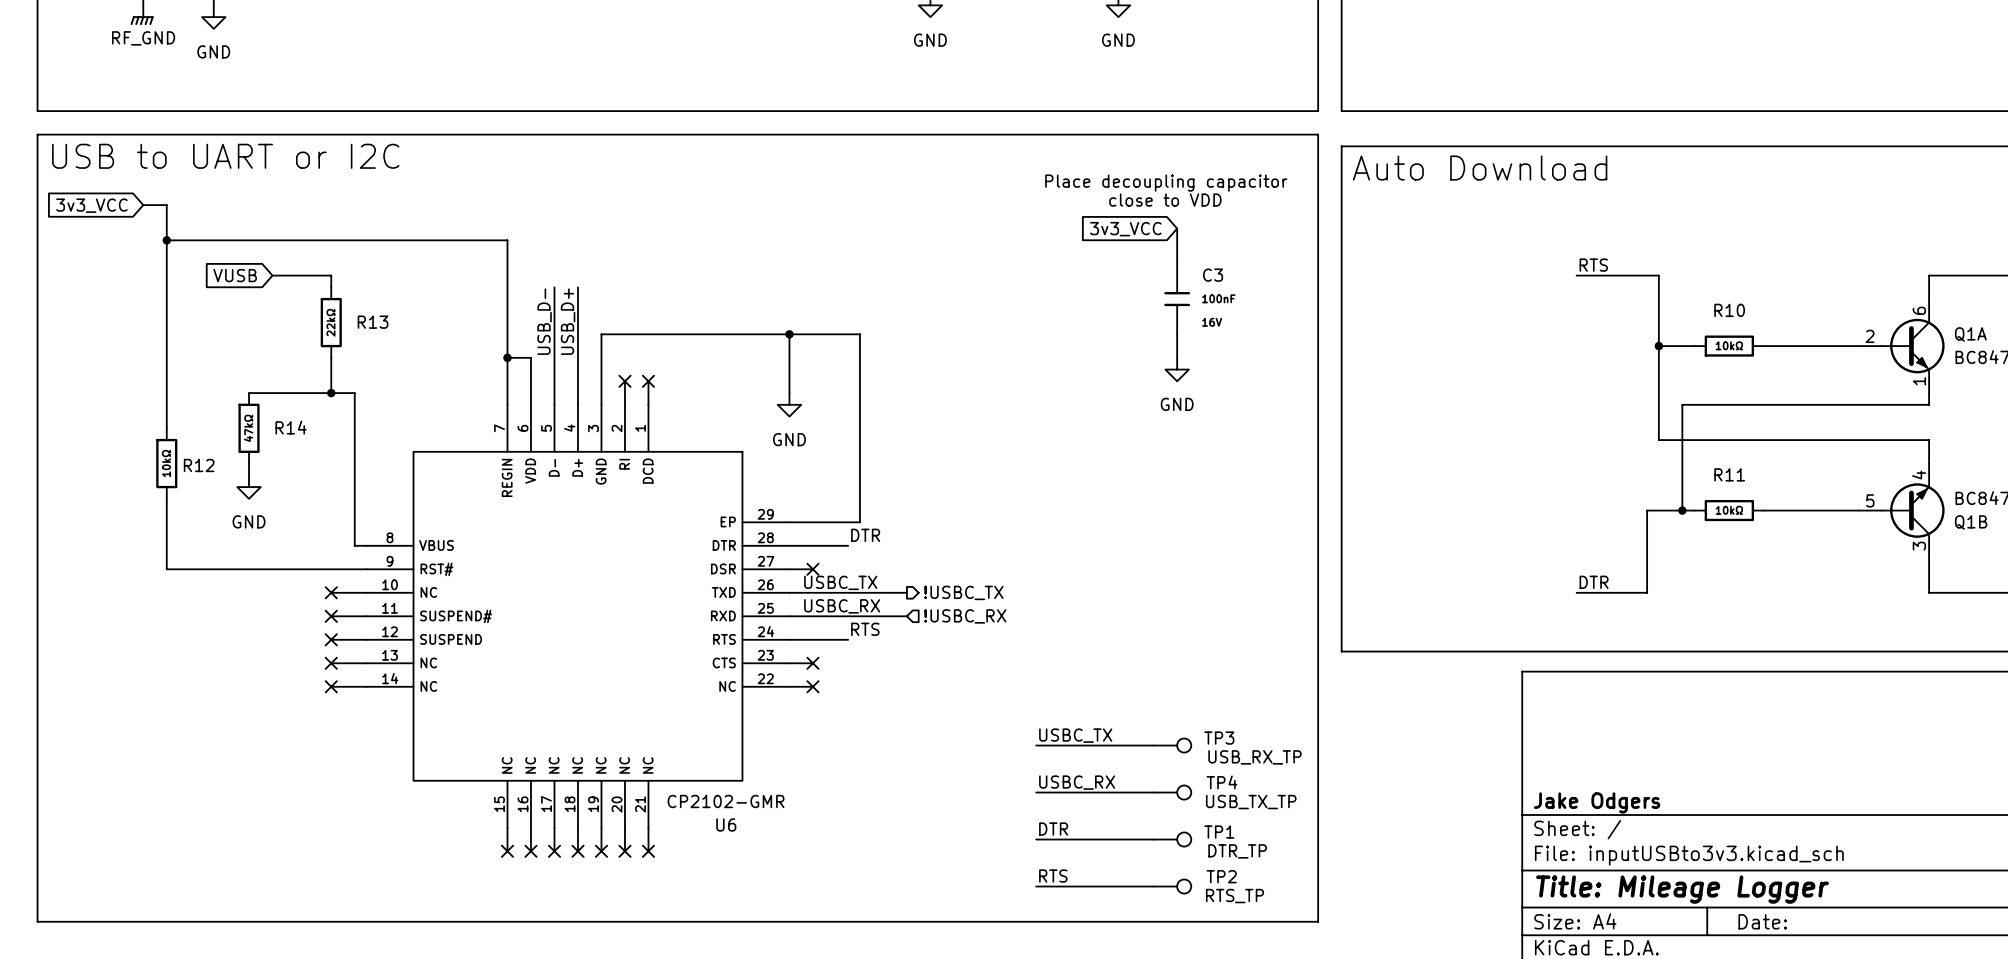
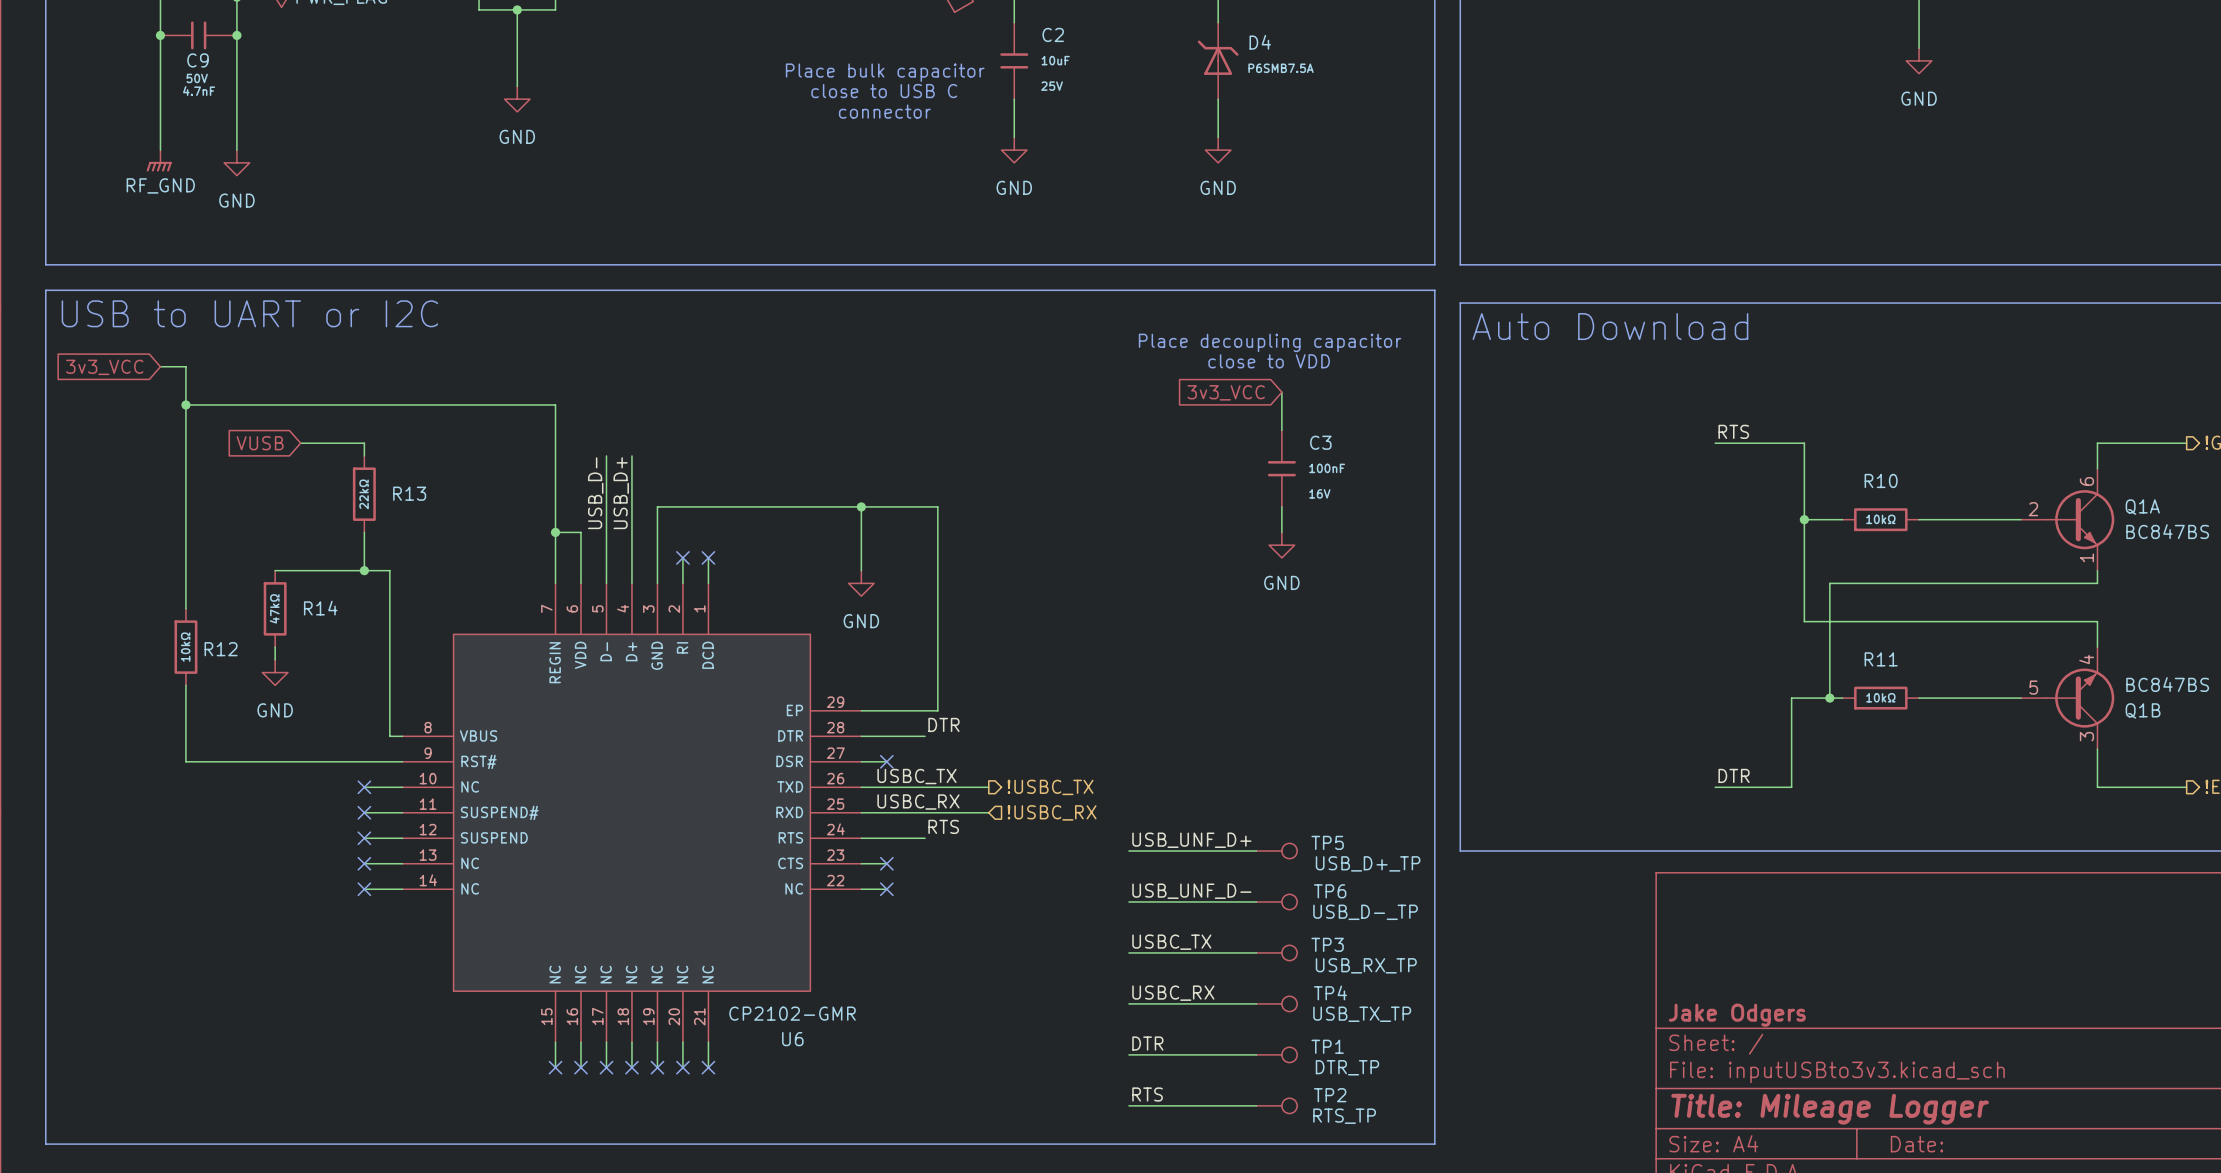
label: none -> USB_UNF_D+ (1191, 840)
wire: none -> (1128, 851) (1256, 851)
TP5: none -> USB_D+_TP (1276, 851)
label: none -> USB_UNF_D- (1191, 891)
wire: none -> (1128, 901) (1256, 901)
TP6: none -> USB_D-_TP (1276, 901)

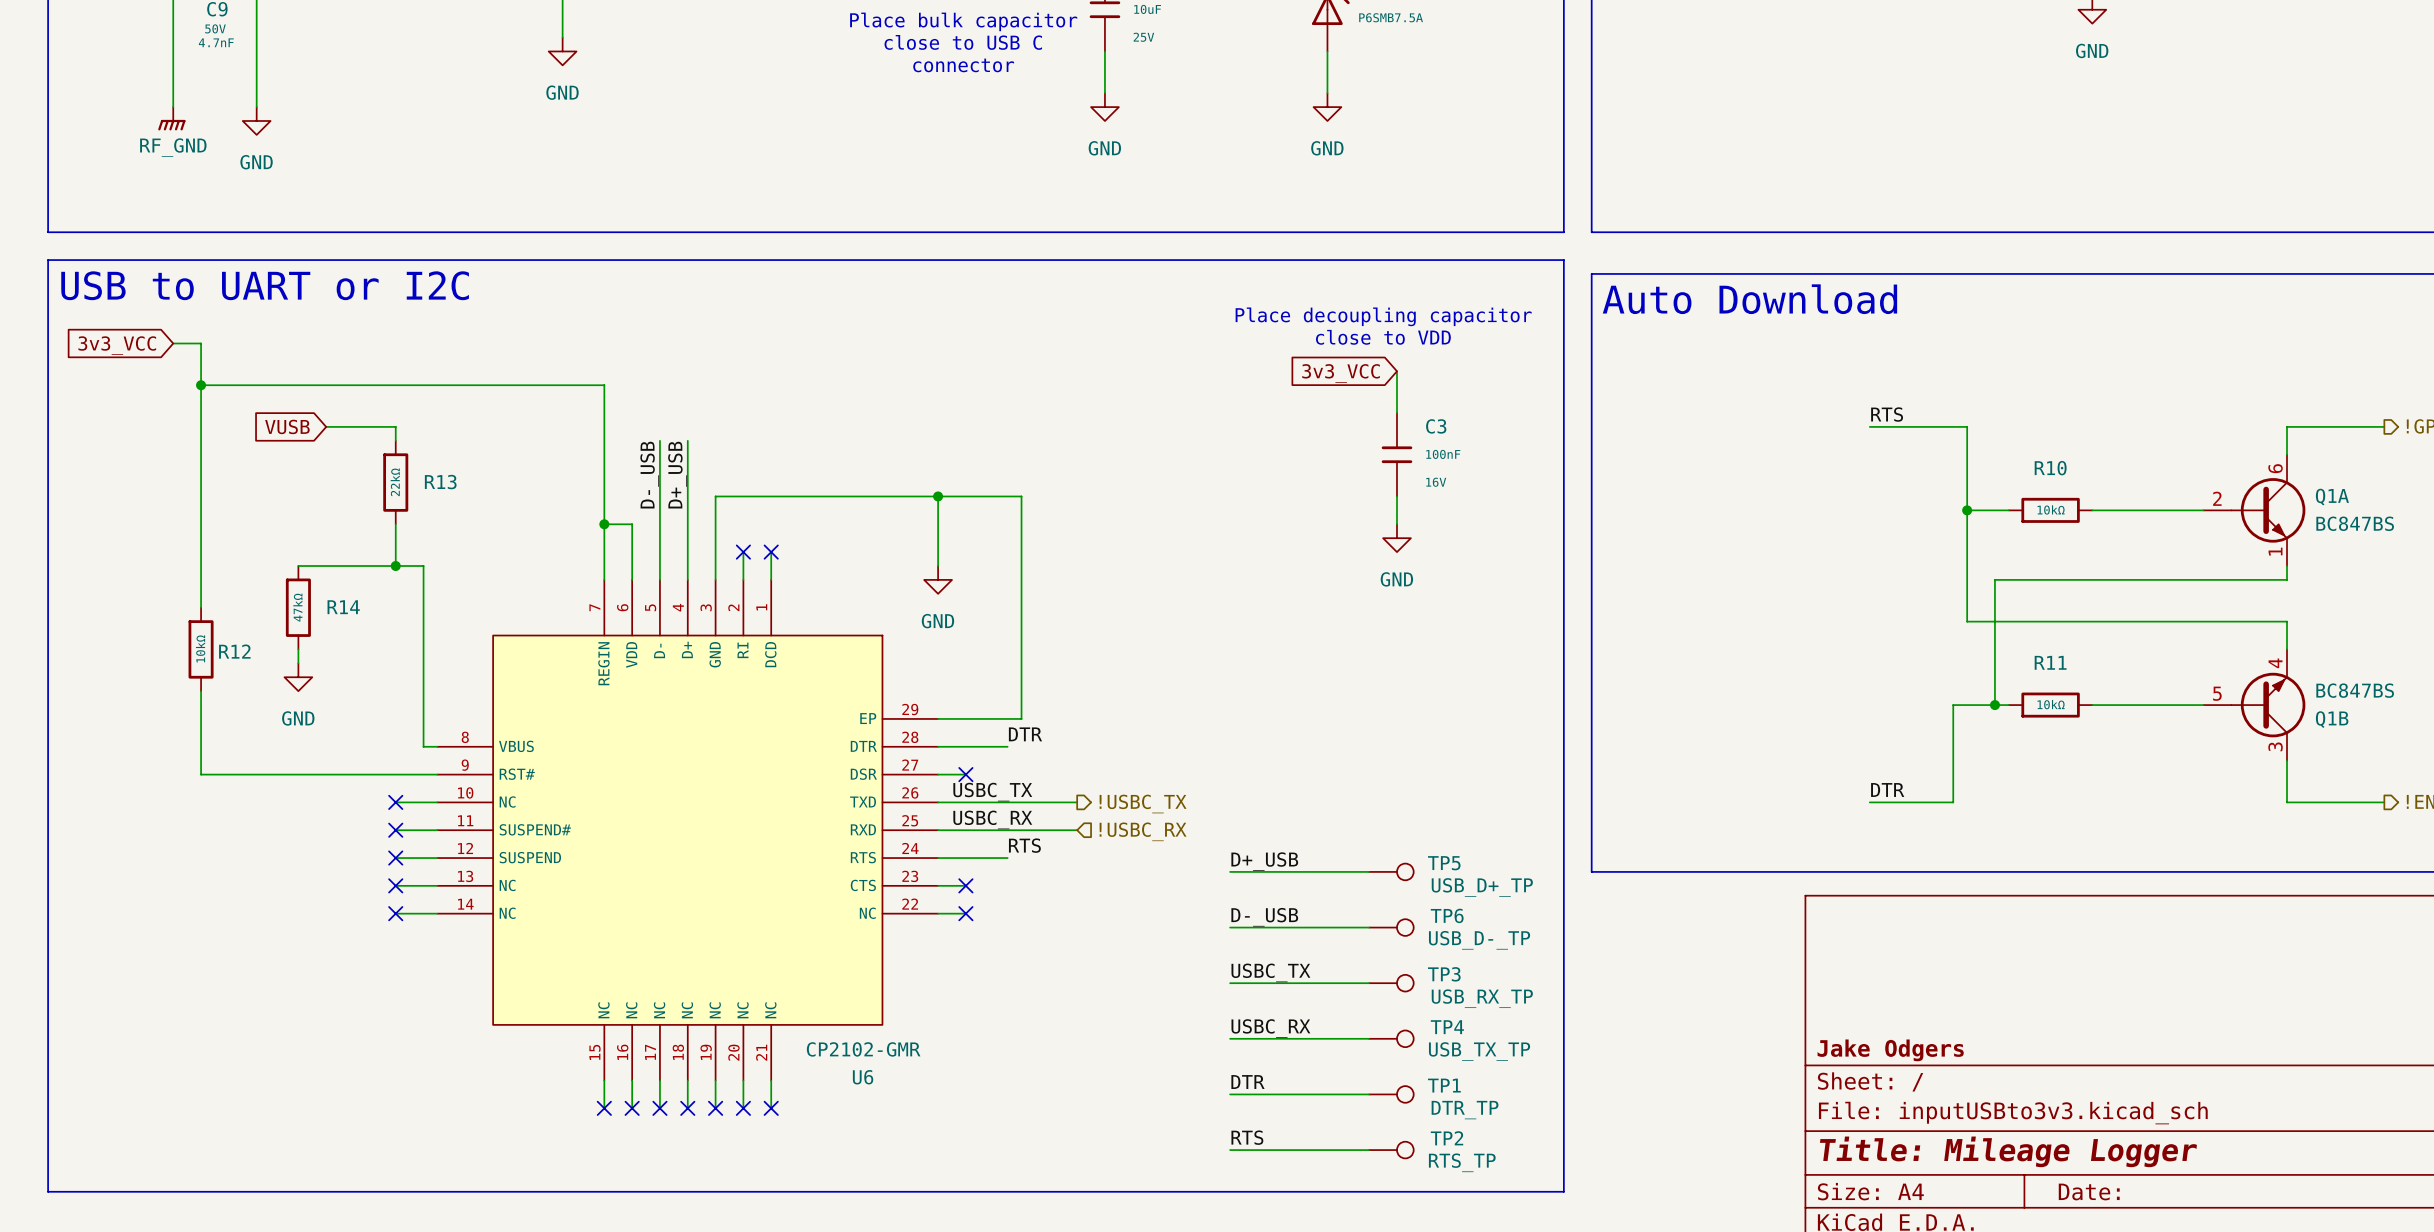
label: USB_D- (595, 493) -> none
label: USB_D+ (621, 493) -> none
label: none -> D-_USB (649, 475)
label: none -> D+_USB (677, 475)
label: USB_UNF_D+ (1191, 840) -> D+_USB (1264, 861)
label: USB_UNF_D- (1191, 891) -> D-_USB (1264, 917)

